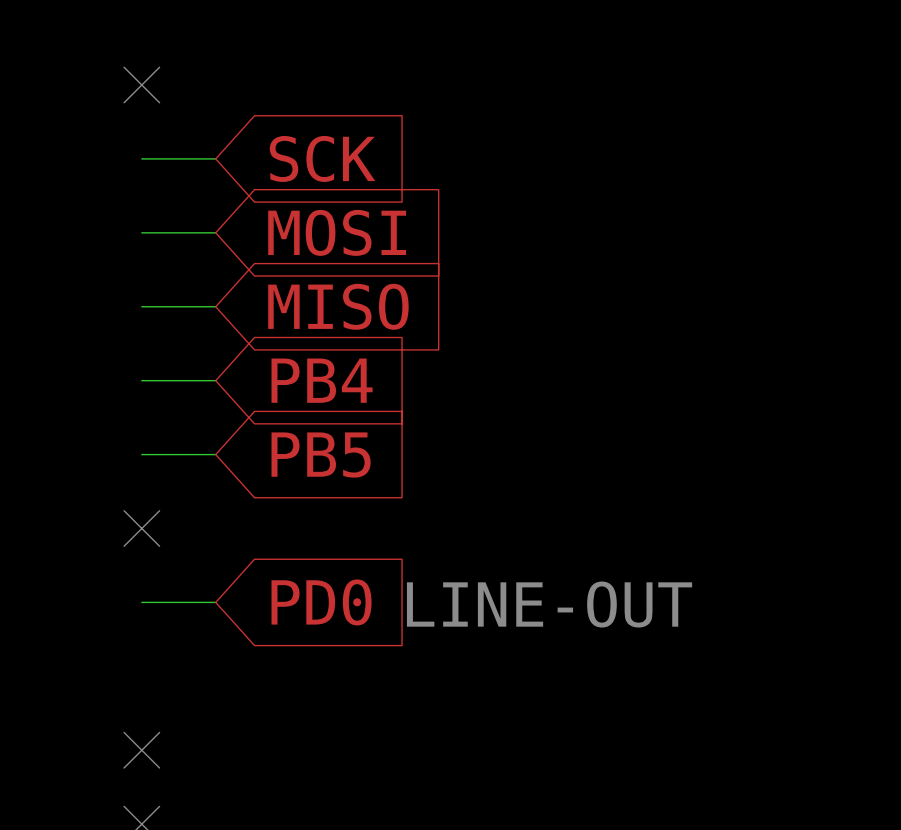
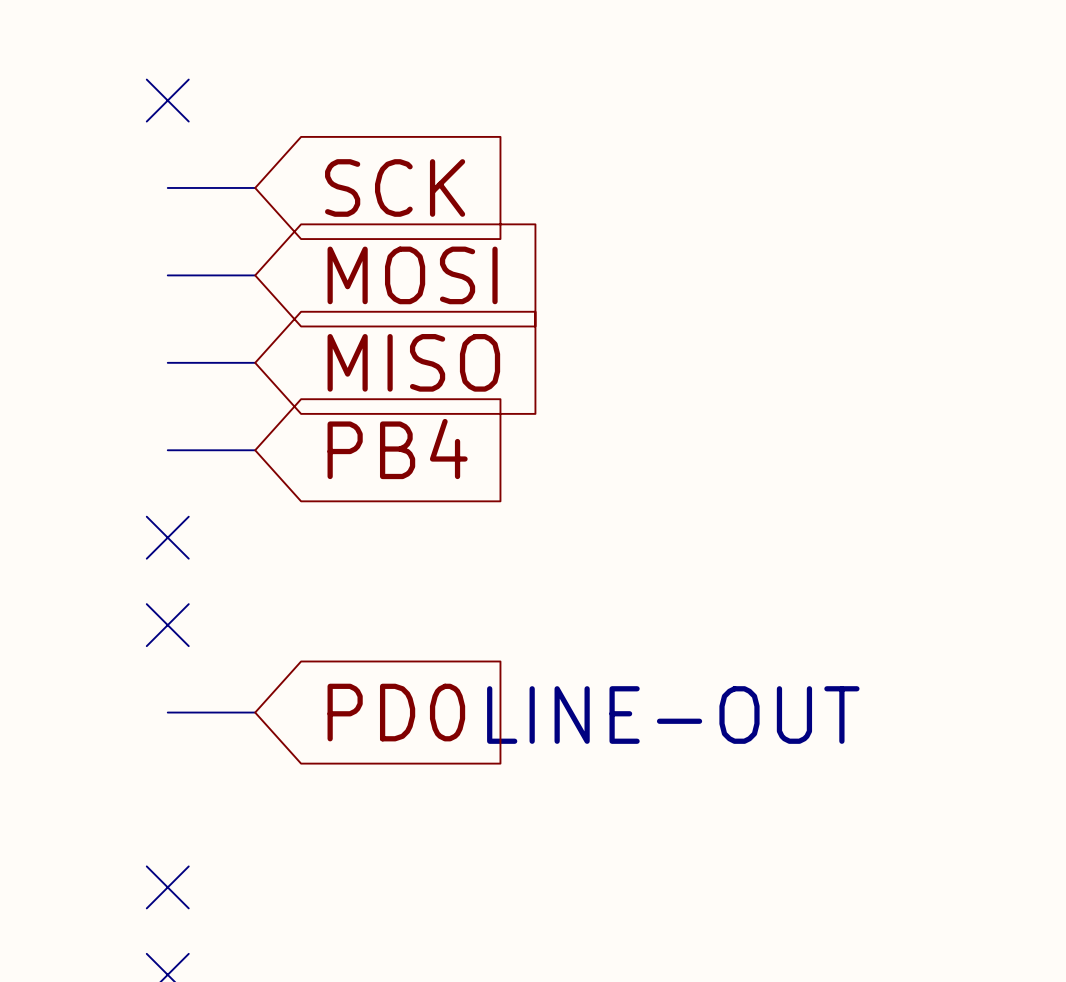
wire: (141, 454) (215, 454) -> none
no-connect mark: none -> (167, 537)
global label: PB5 (321, 455) -> none

